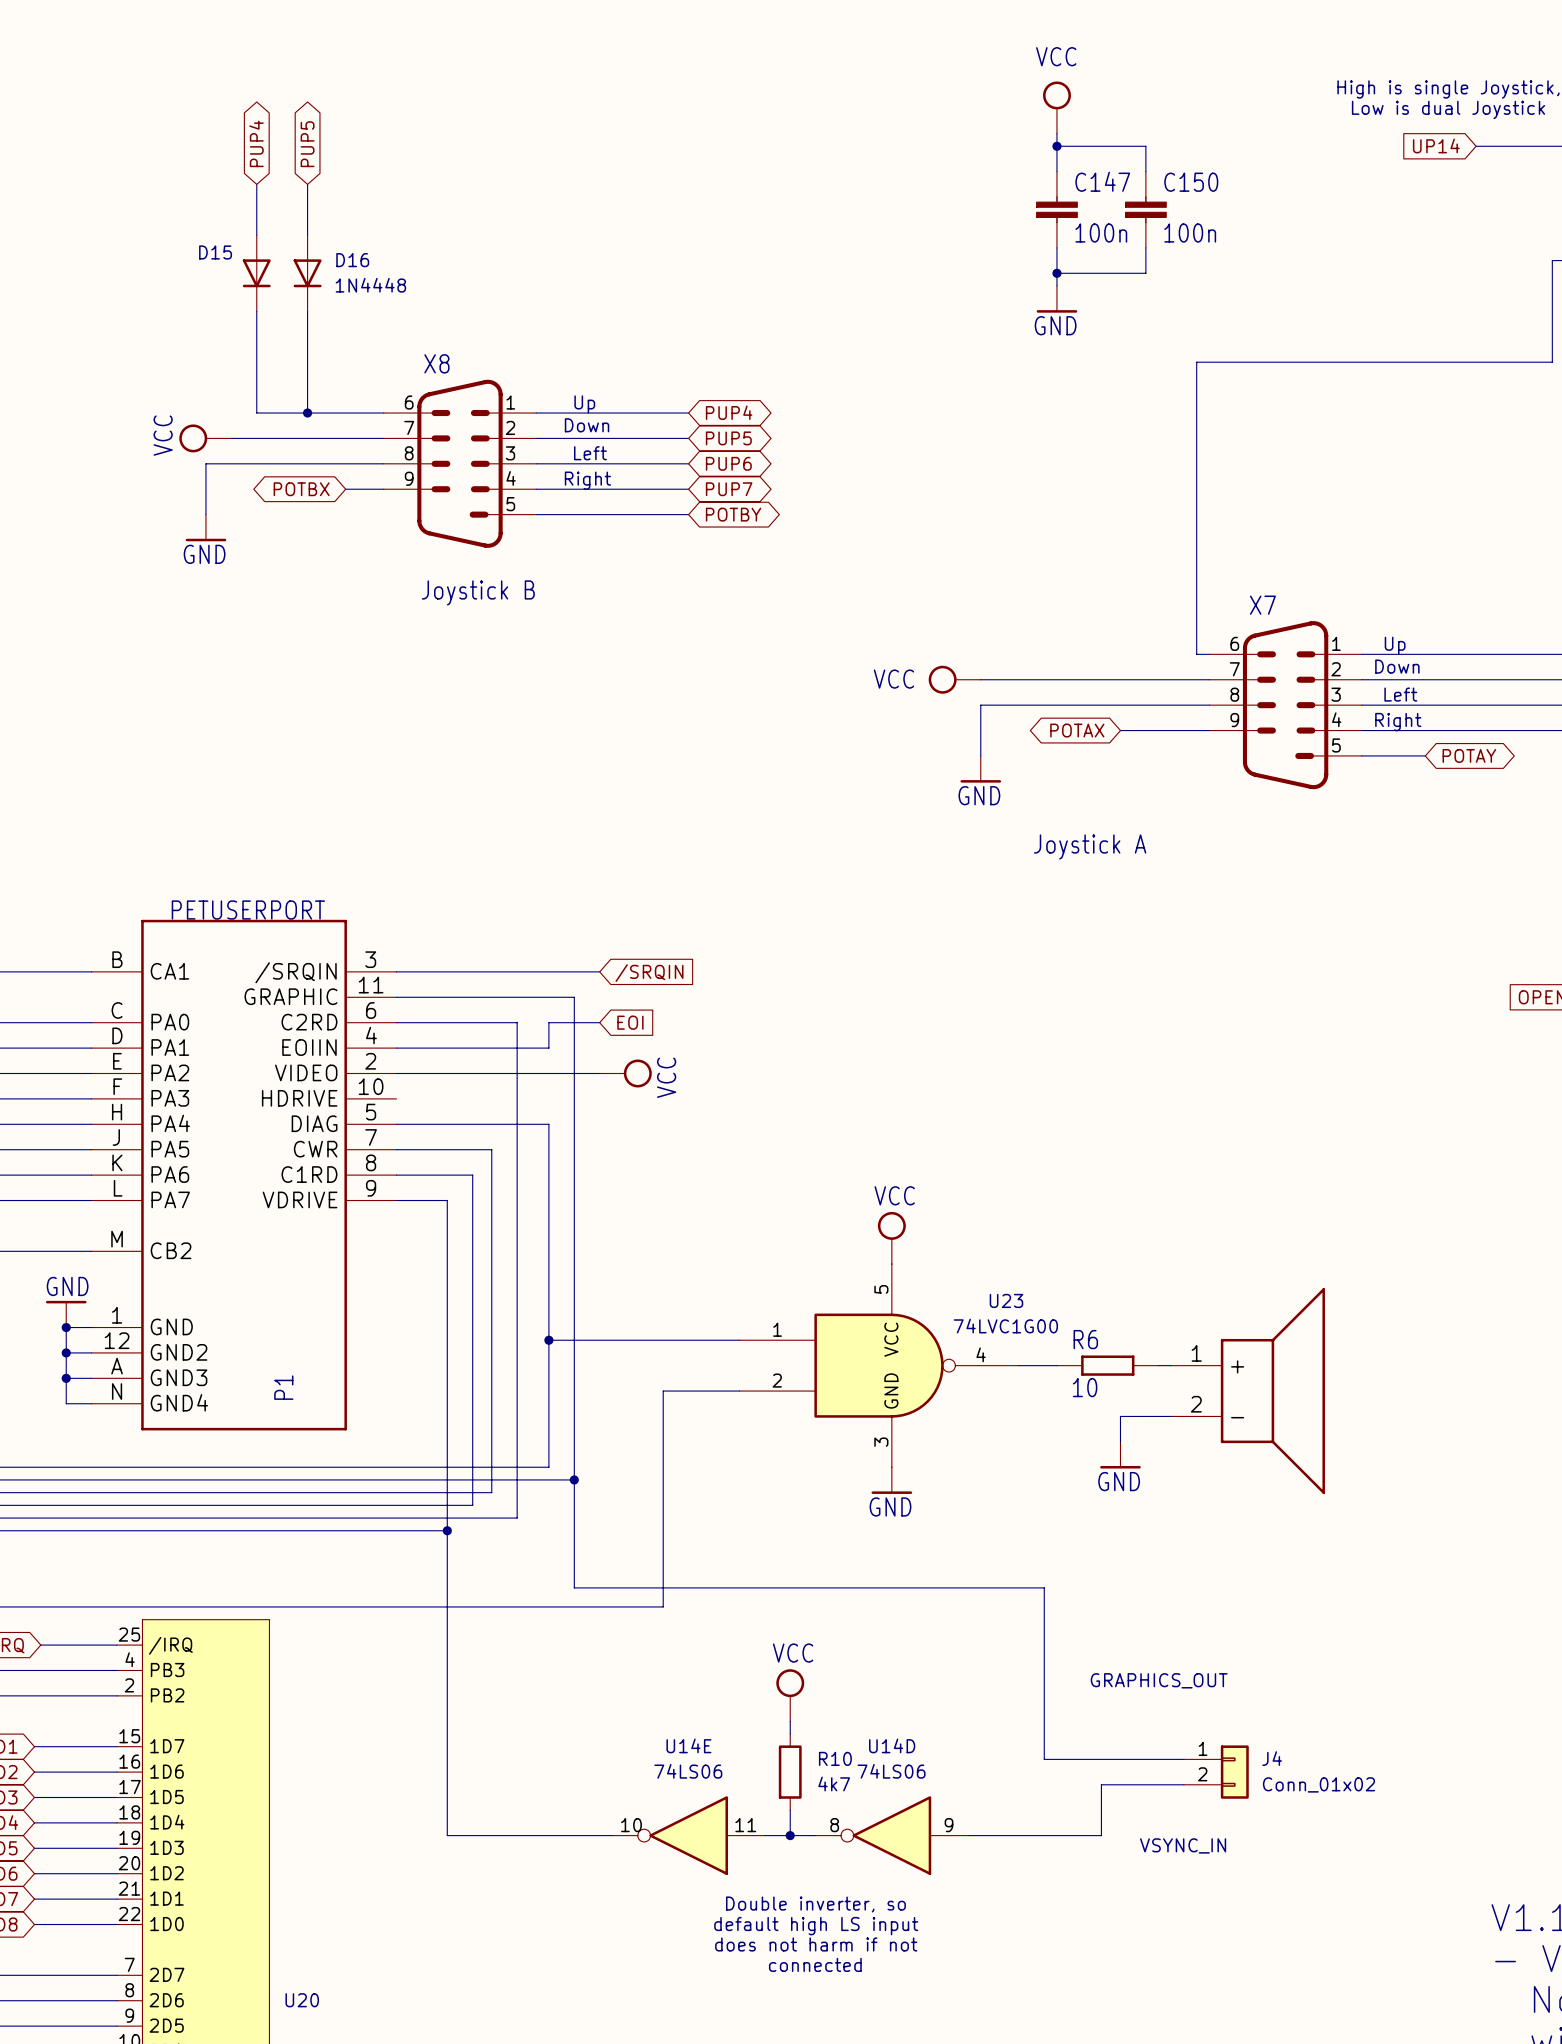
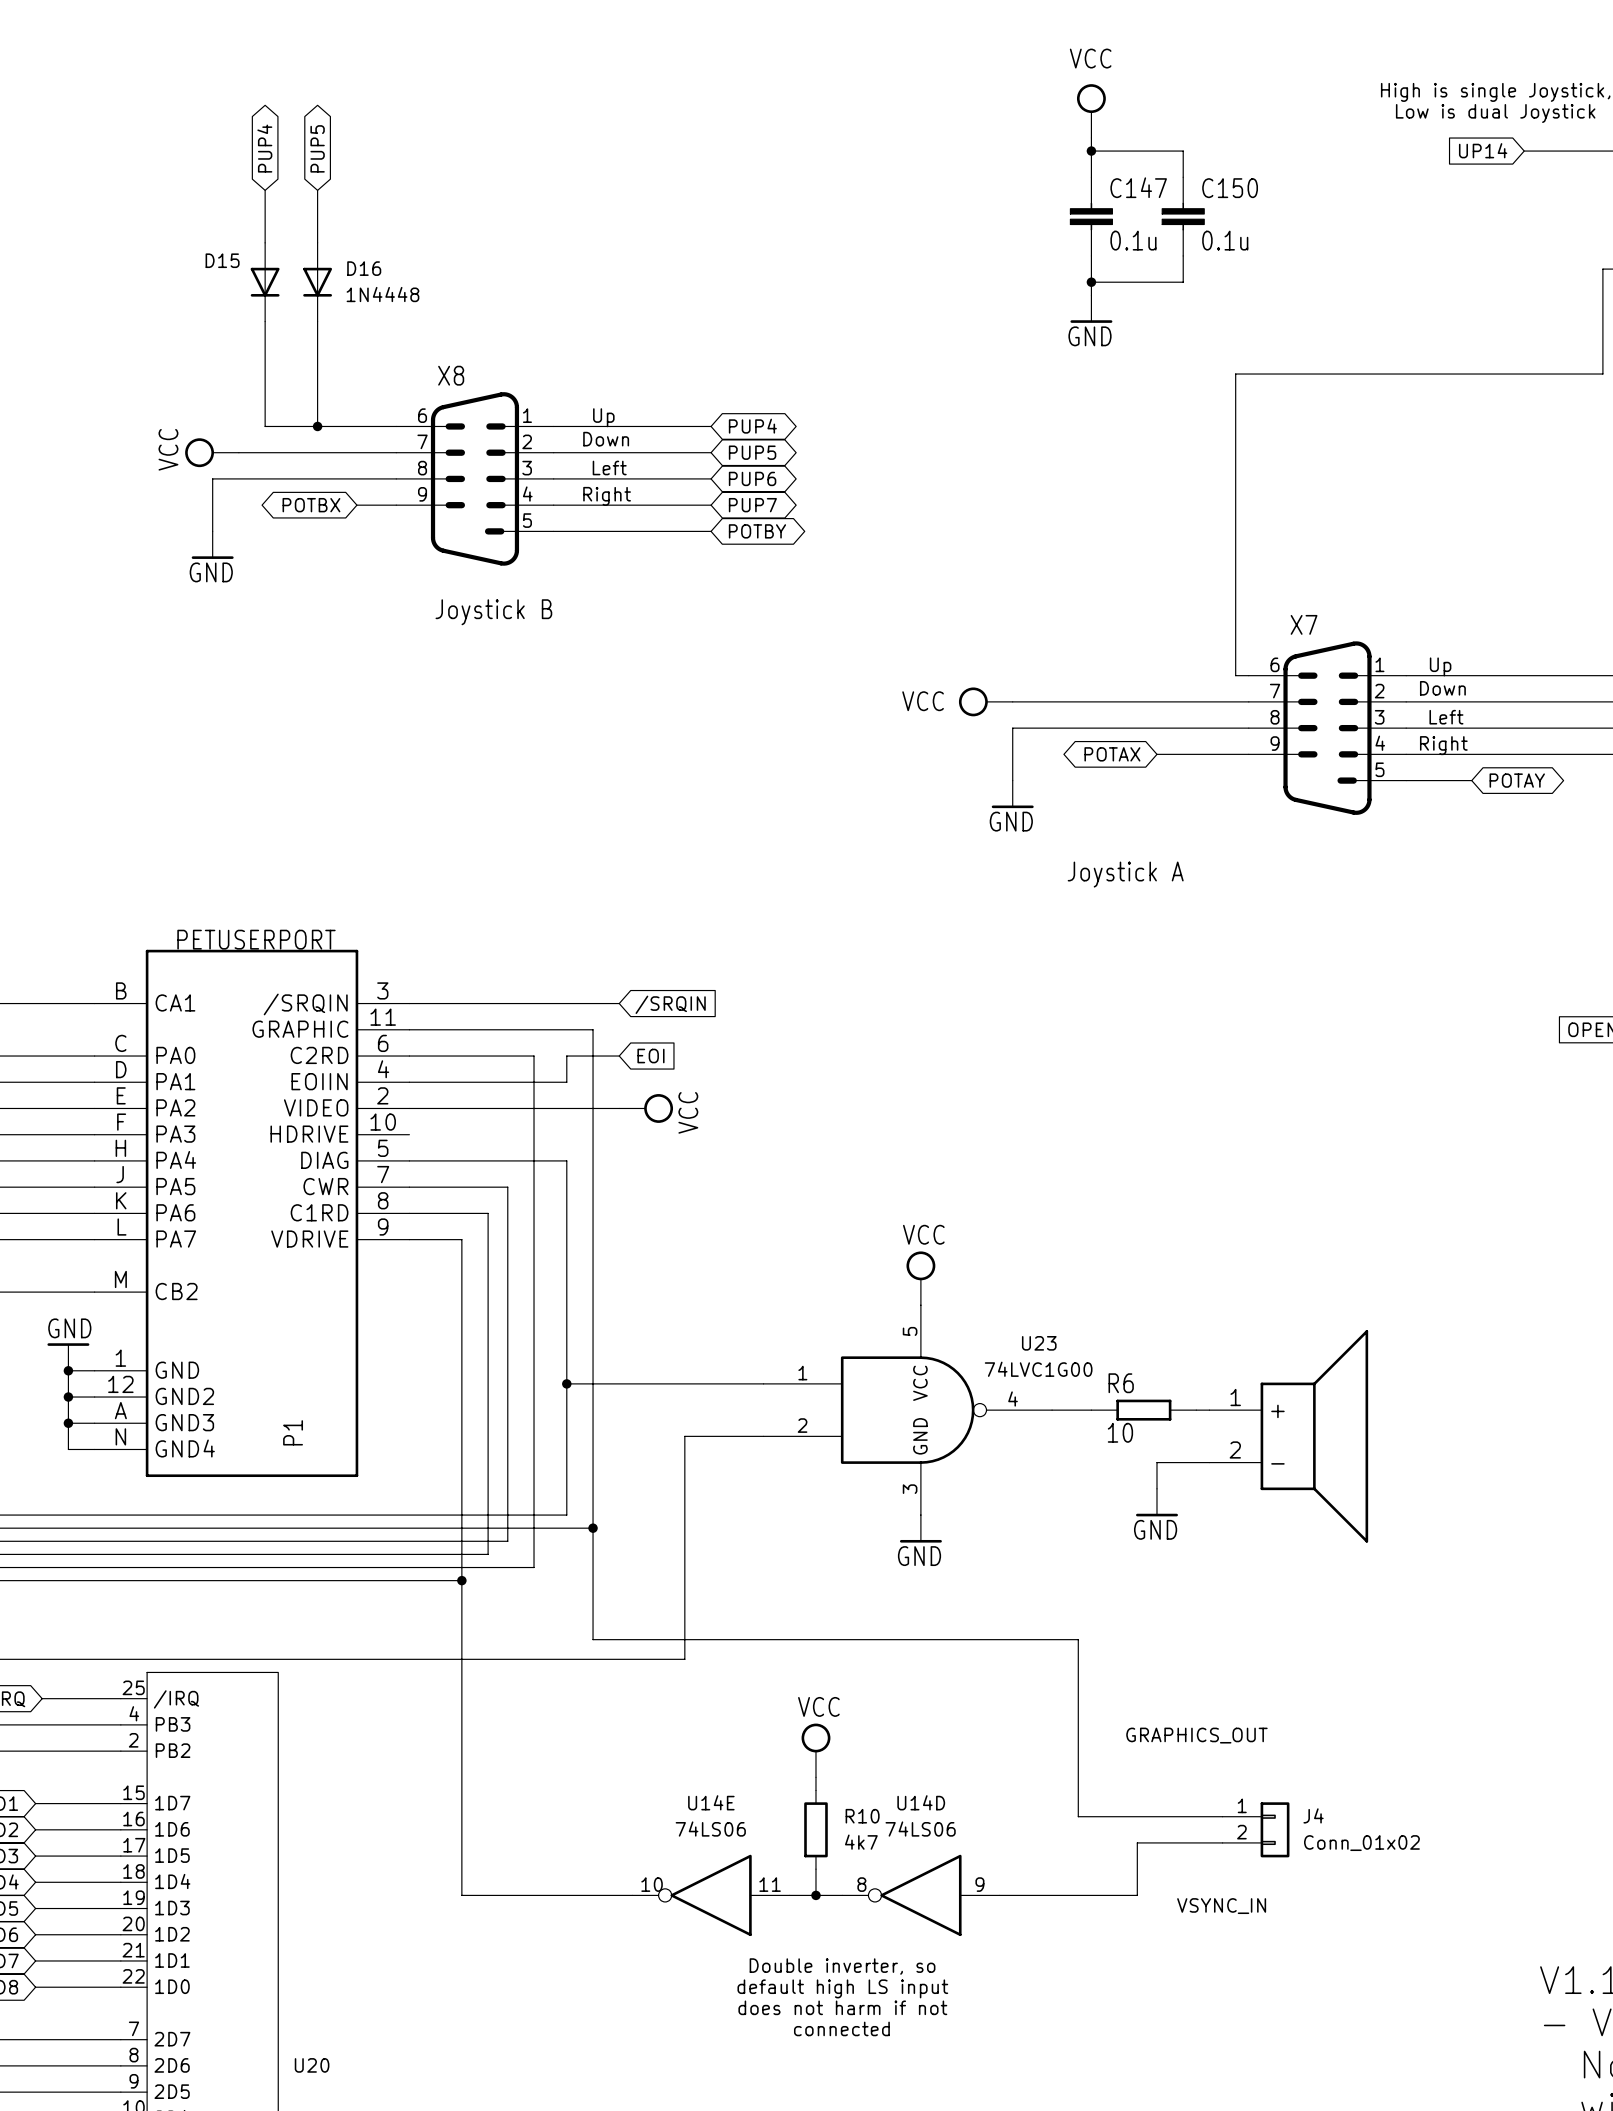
C147 value: 100n (1101, 233) -> 0.1u (1133, 240)
C150 value: 100n (1190, 233) -> 0.1u (1225, 240)

